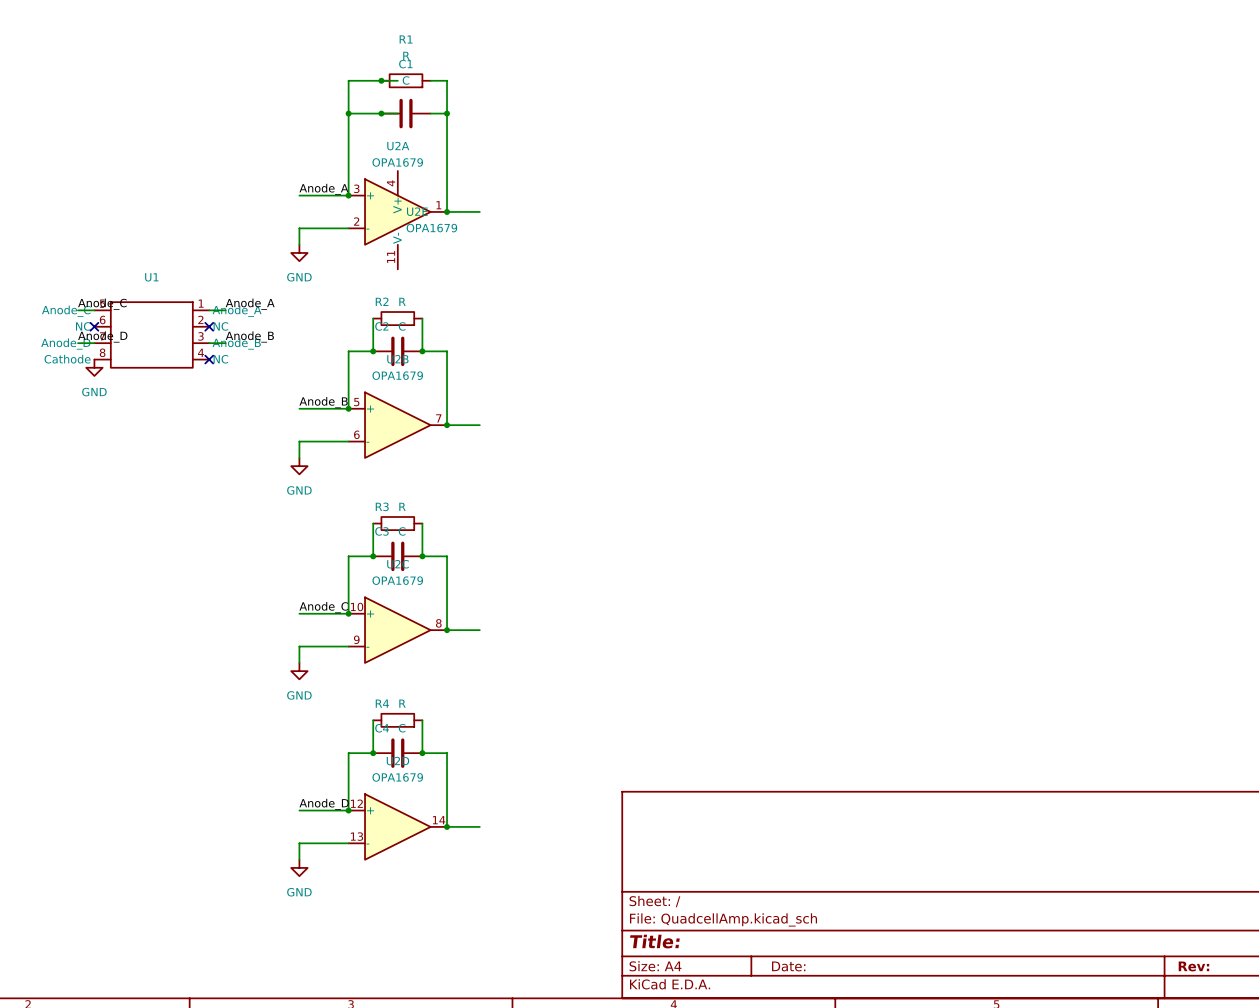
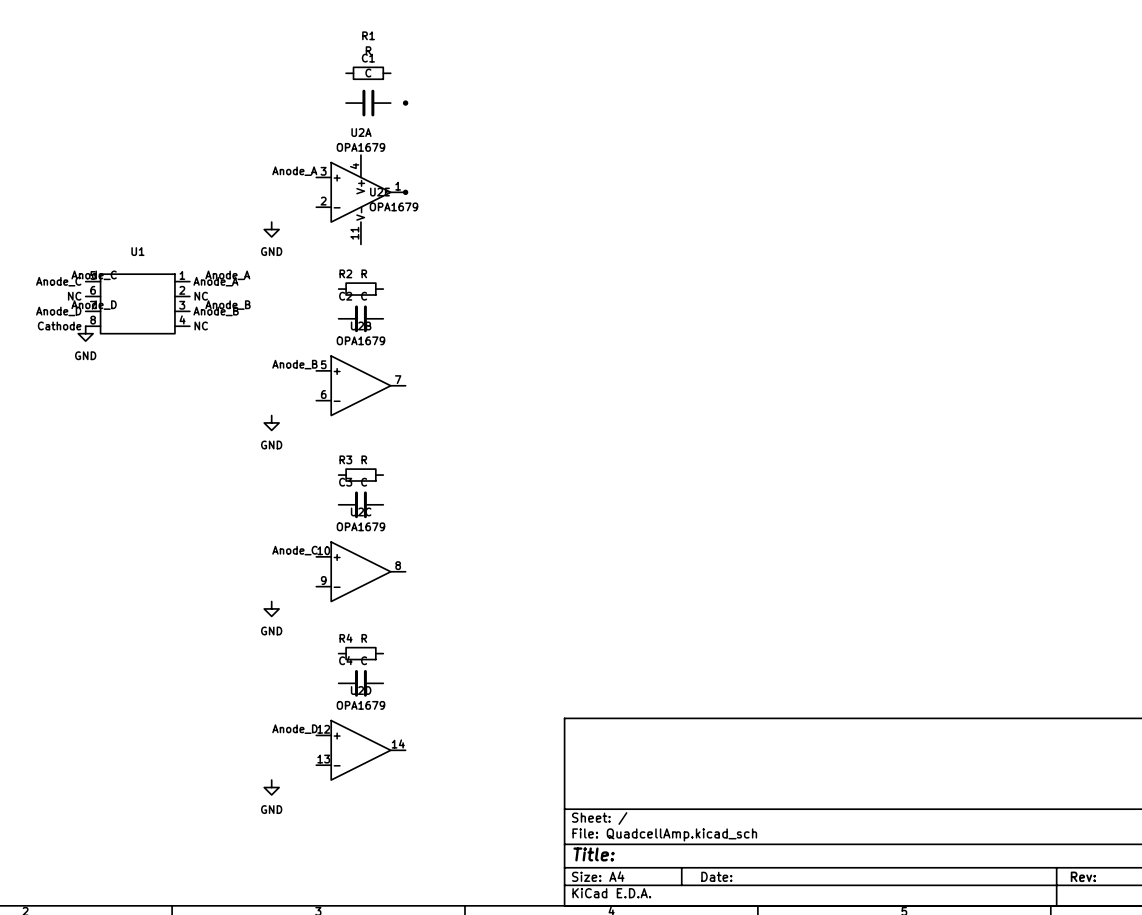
junction: (381, 80) -> none
wire: (397, 80) (348, 80) (348, 195) (299, 195) -> none
wire: (430, 80) (447, 80) (447, 211) (479, 211) -> none
wire: (348, 113) (397, 113) -> none
junction: (348, 113) -> none
junction: (381, 113) -> none
wire: (430, 113) (447, 113) -> none
junction: (348, 195) -> none
wire: (348, 228) (299, 228) (299, 244) -> none
wire: (78, 310) (94, 310) -> none
wire: (209, 310) (225, 310) -> none
wire: (373, 318) (373, 351) (348, 351) (348, 408) (299, 408) -> none
wire: (422, 318) (422, 351) (447, 351) (447, 425) (479, 425) -> none
no-connect mark: (94, 326) -> none
no-connect mark: (209, 326) -> none
wire: (78, 343) (94, 343) -> none
wire: (209, 343) (225, 343) -> none
junction: (373, 351) -> none
junction: (422, 351) -> none
no-connect mark: (209, 359) -> none
junction: (348, 408) -> none
junction: (447, 425) -> none
wire: (348, 441) (299, 441) (299, 457) -> none
wire: (373, 523) (373, 556) (348, 556) (348, 613) (299, 613) -> none
wire: (422, 523) (422, 556) (447, 556) (447, 630) (479, 630) -> none
junction: (373, 556) -> none
junction: (422, 556) -> none
junction: (348, 613) -> none
junction: (447, 630) -> none
wire: (348, 646) (299, 646) (299, 662) -> none
wire: (373, 720) (373, 753) (348, 753) (348, 810) (299, 810) -> none
wire: (422, 720) (422, 753) (447, 753) (447, 826) (479, 826) -> none
junction: (373, 753) -> none
junction: (422, 753) -> none
junction: (348, 810) -> none
junction: (447, 826) -> none
wire: (348, 843) (299, 843) (299, 859) -> none

